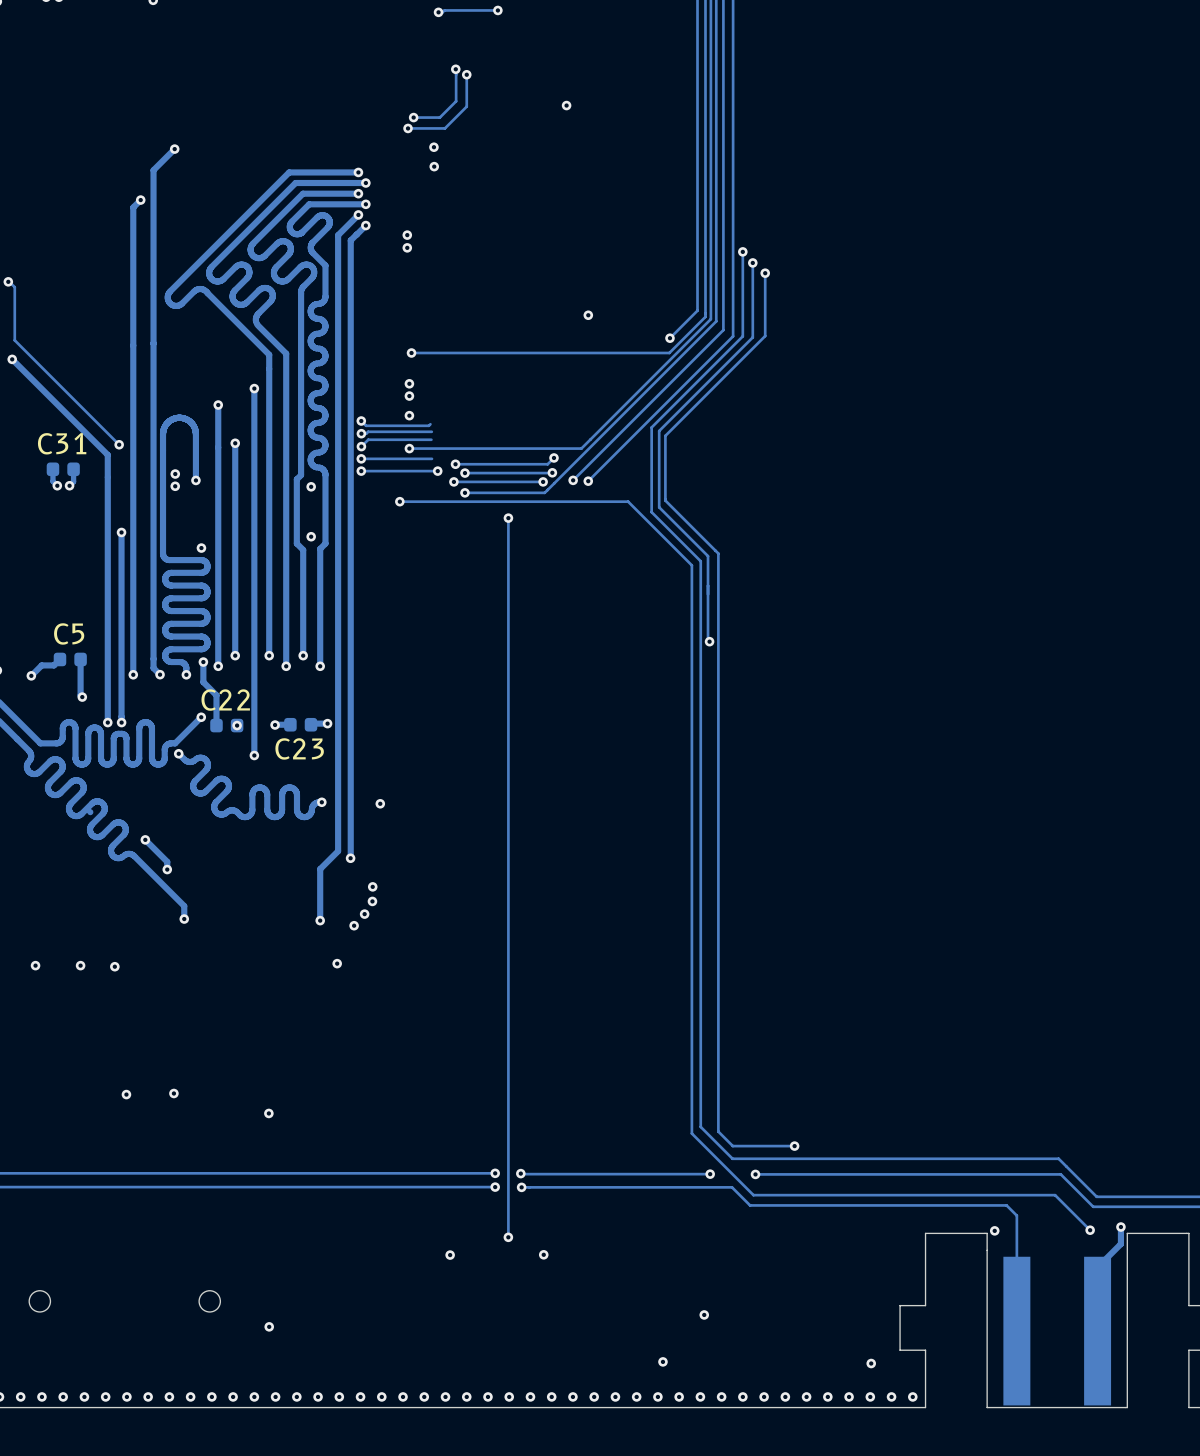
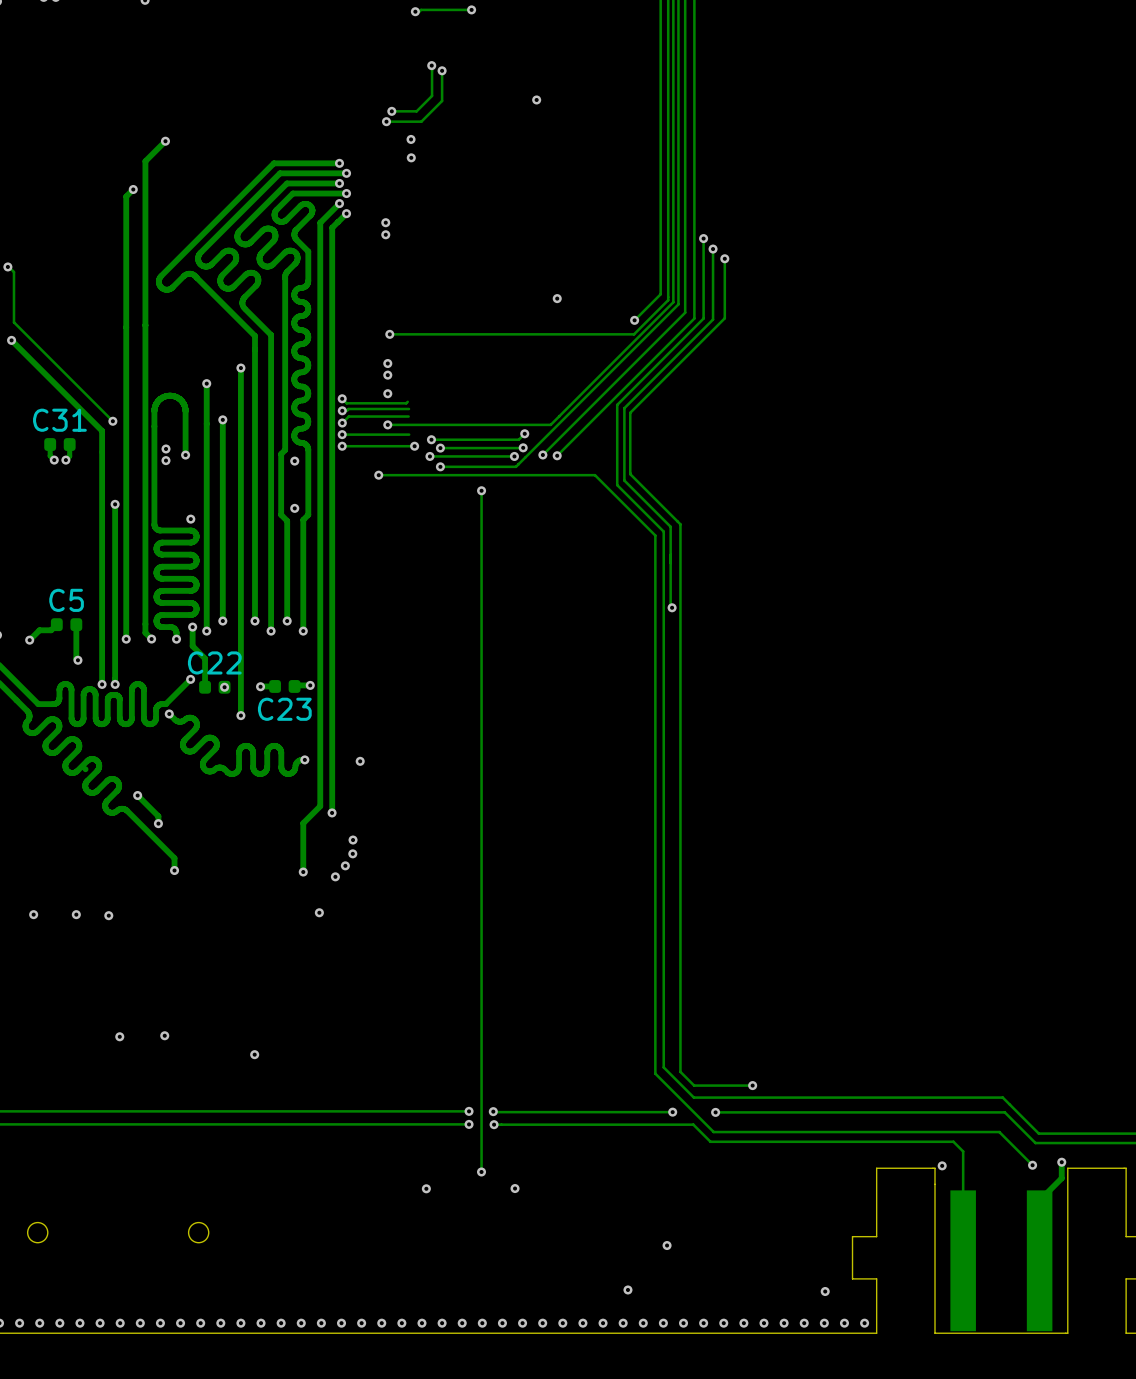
via: (269, 1326) -> none

